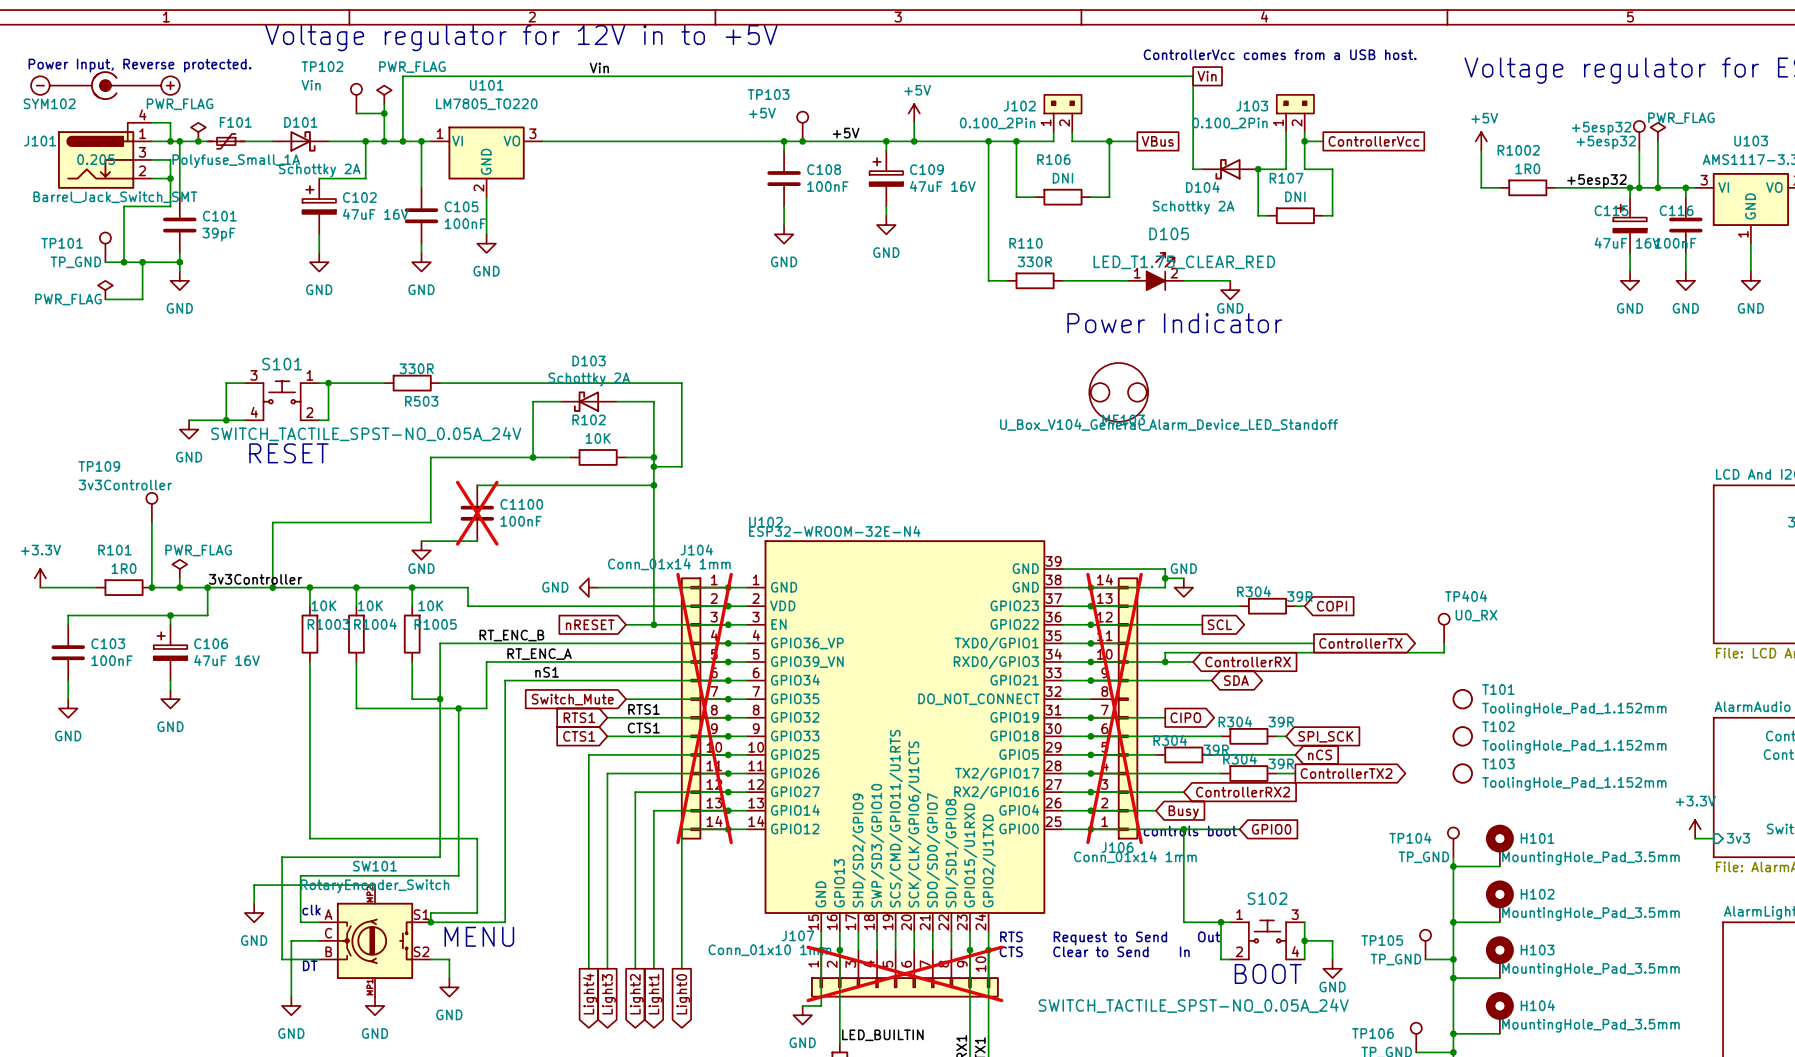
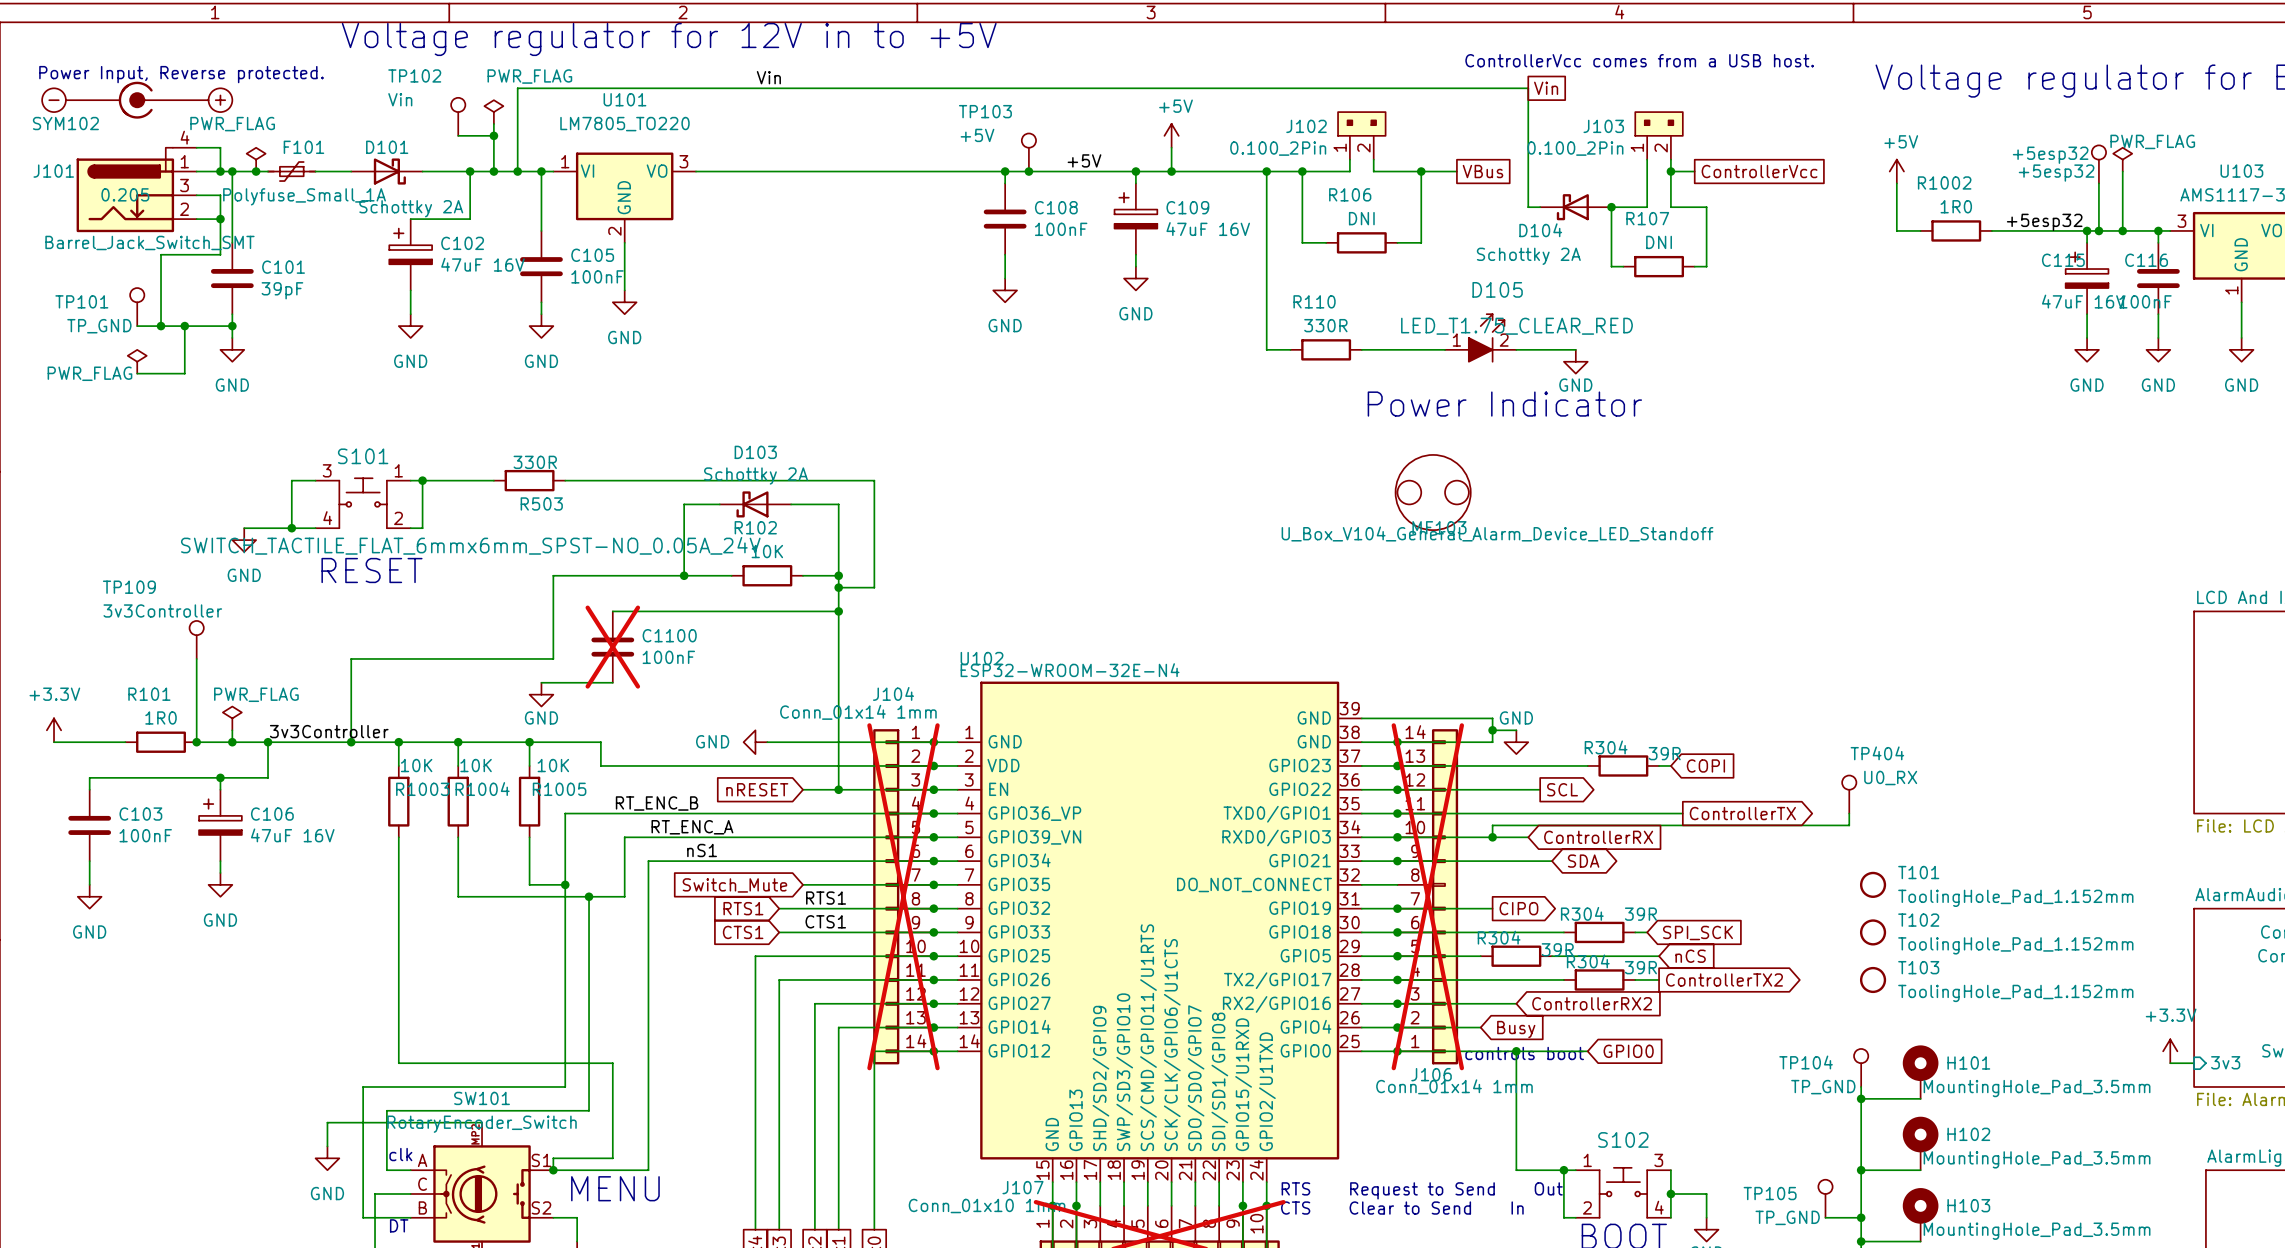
S101 value: SWITCH_TACTILE_SPST-NO_0.05A_24V (366, 434) -> SWITCH_TACTILE_FLAT_6mmx6mm_SPST-NO_0.05A_24V (470, 545)

